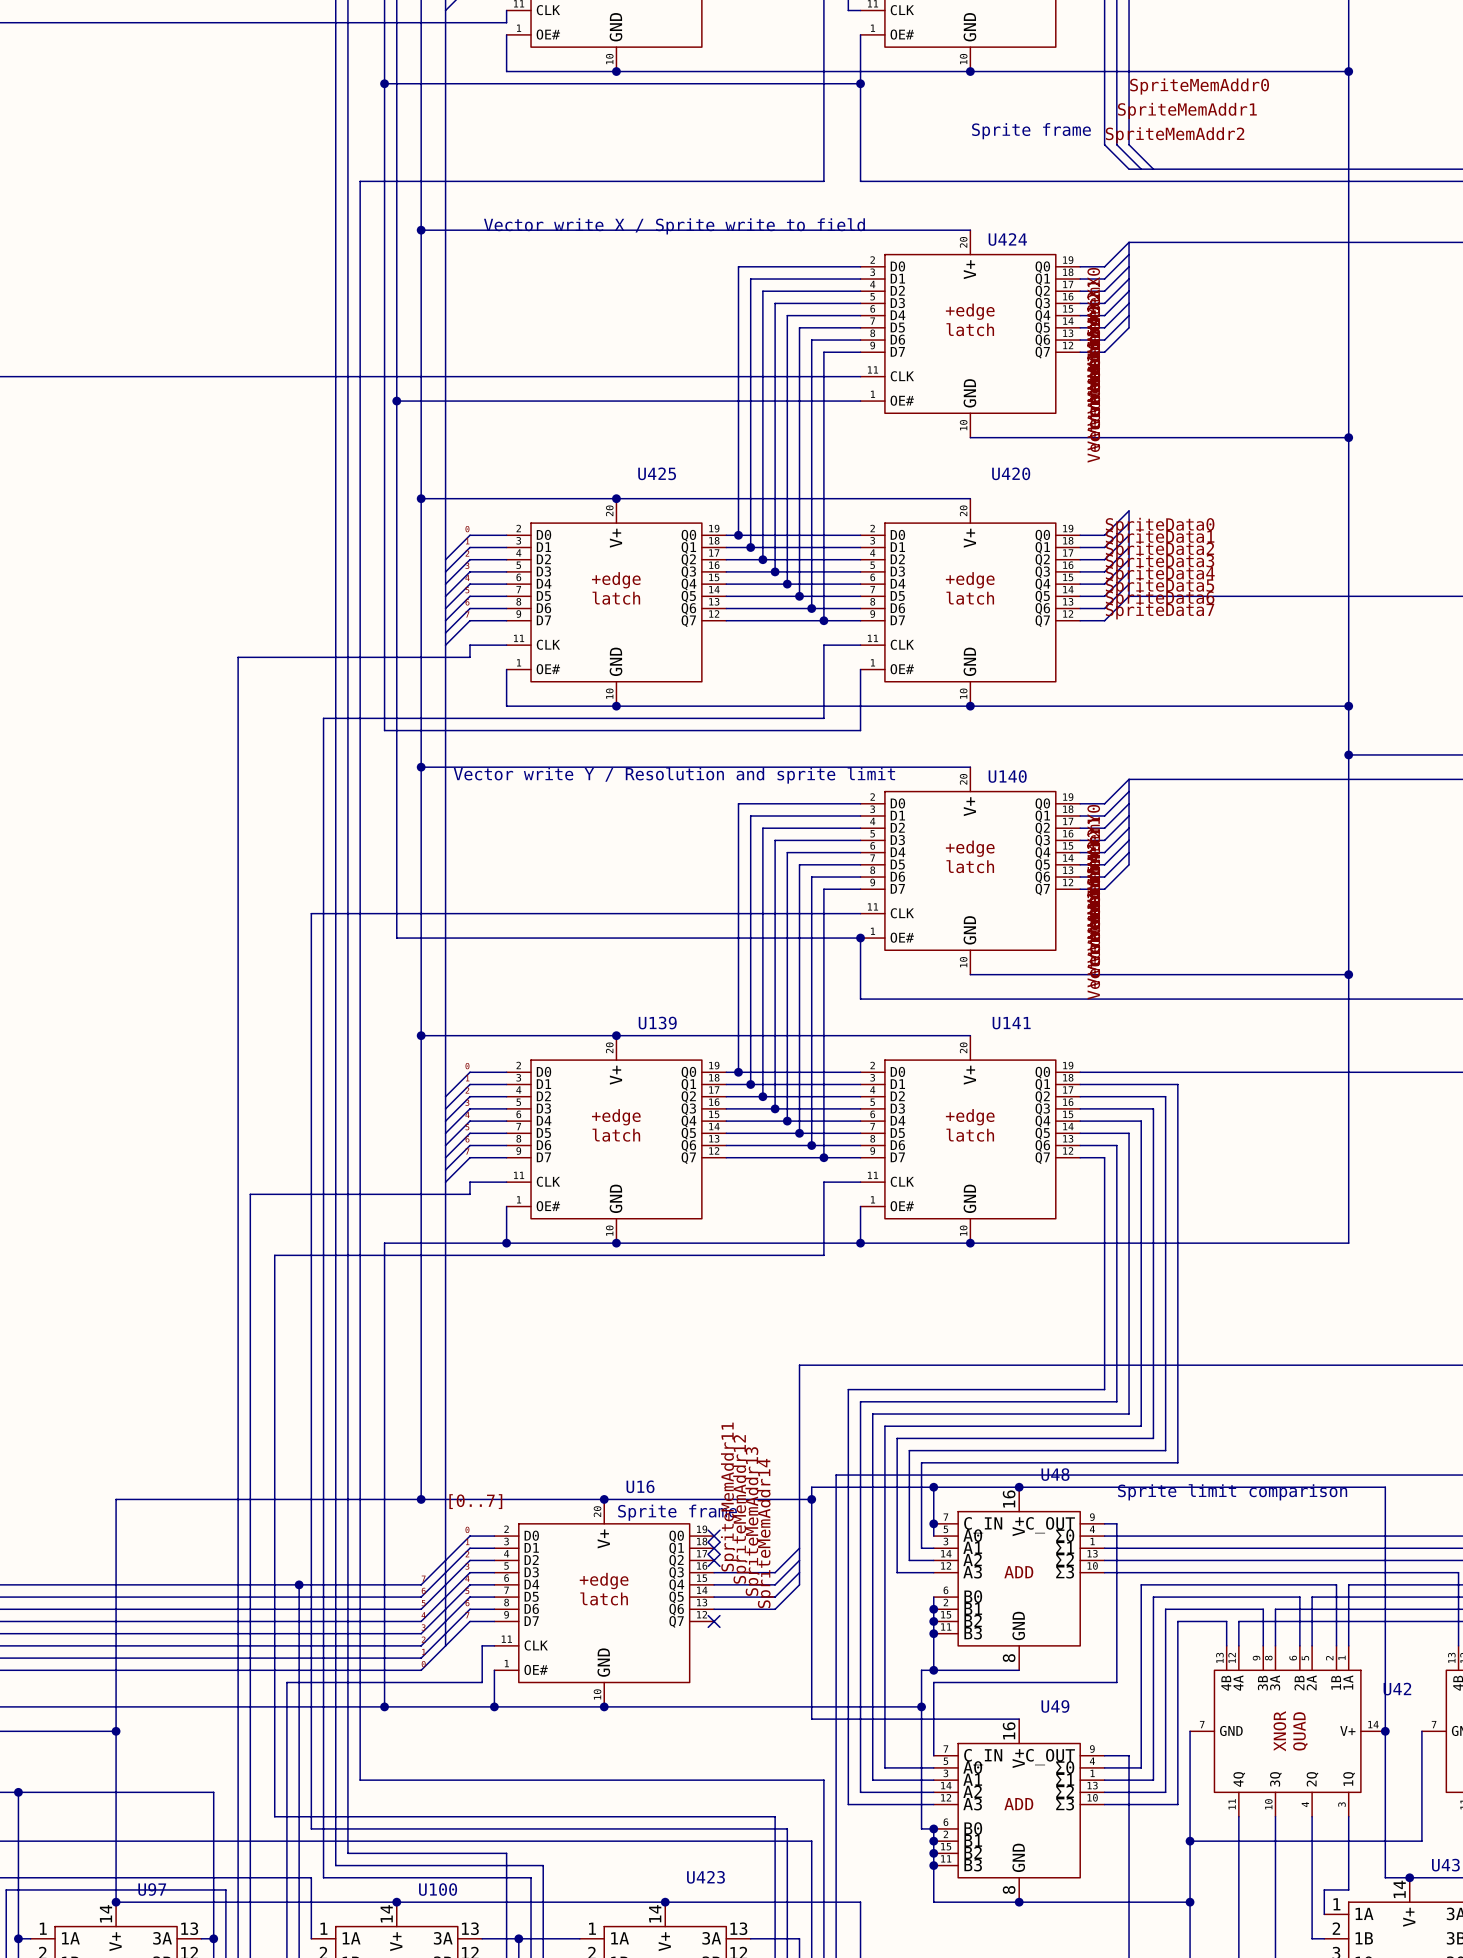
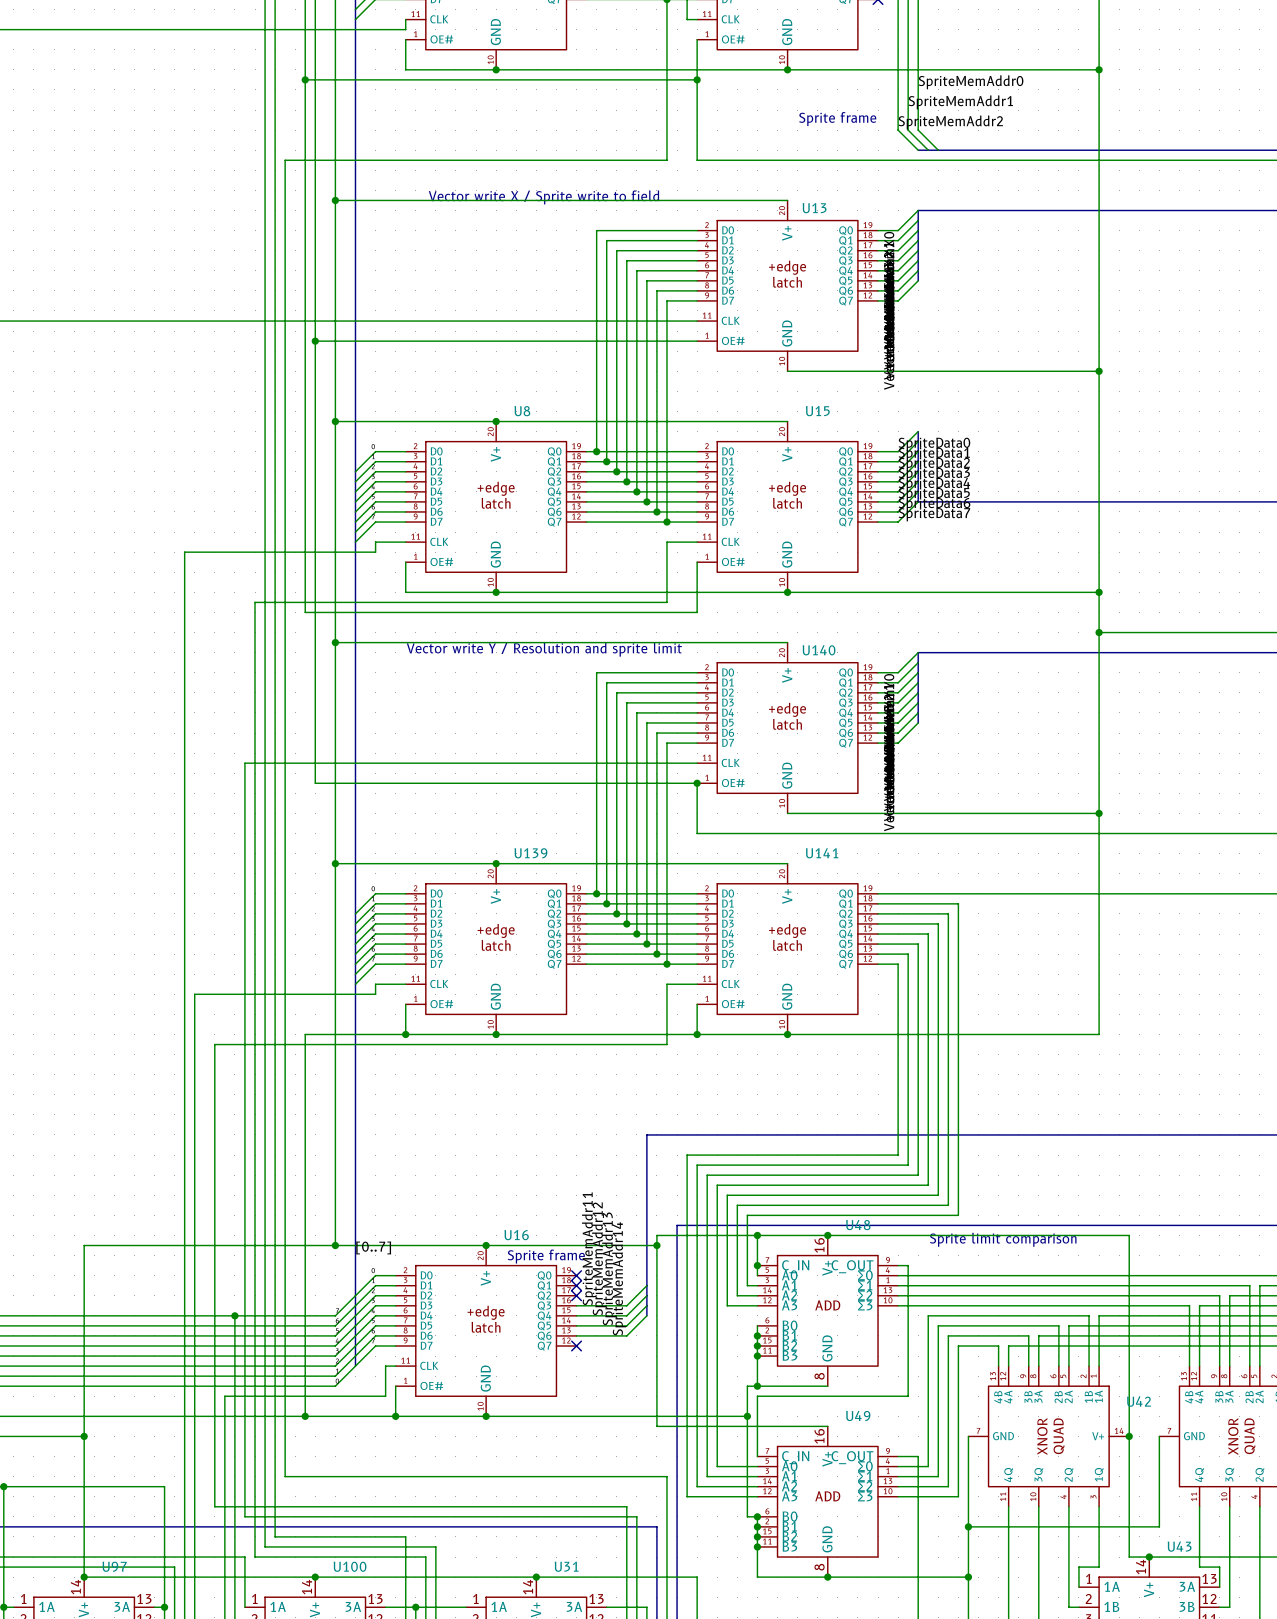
U424 name: U424 (1007, 239) -> U13 (814, 208)
U425 name: U425 (657, 473) -> U8 (522, 411)
U420 name: U420 (1011, 473) -> U15 (817, 411)
U423 name: U423 (705, 1877) -> U31 (566, 1566)

